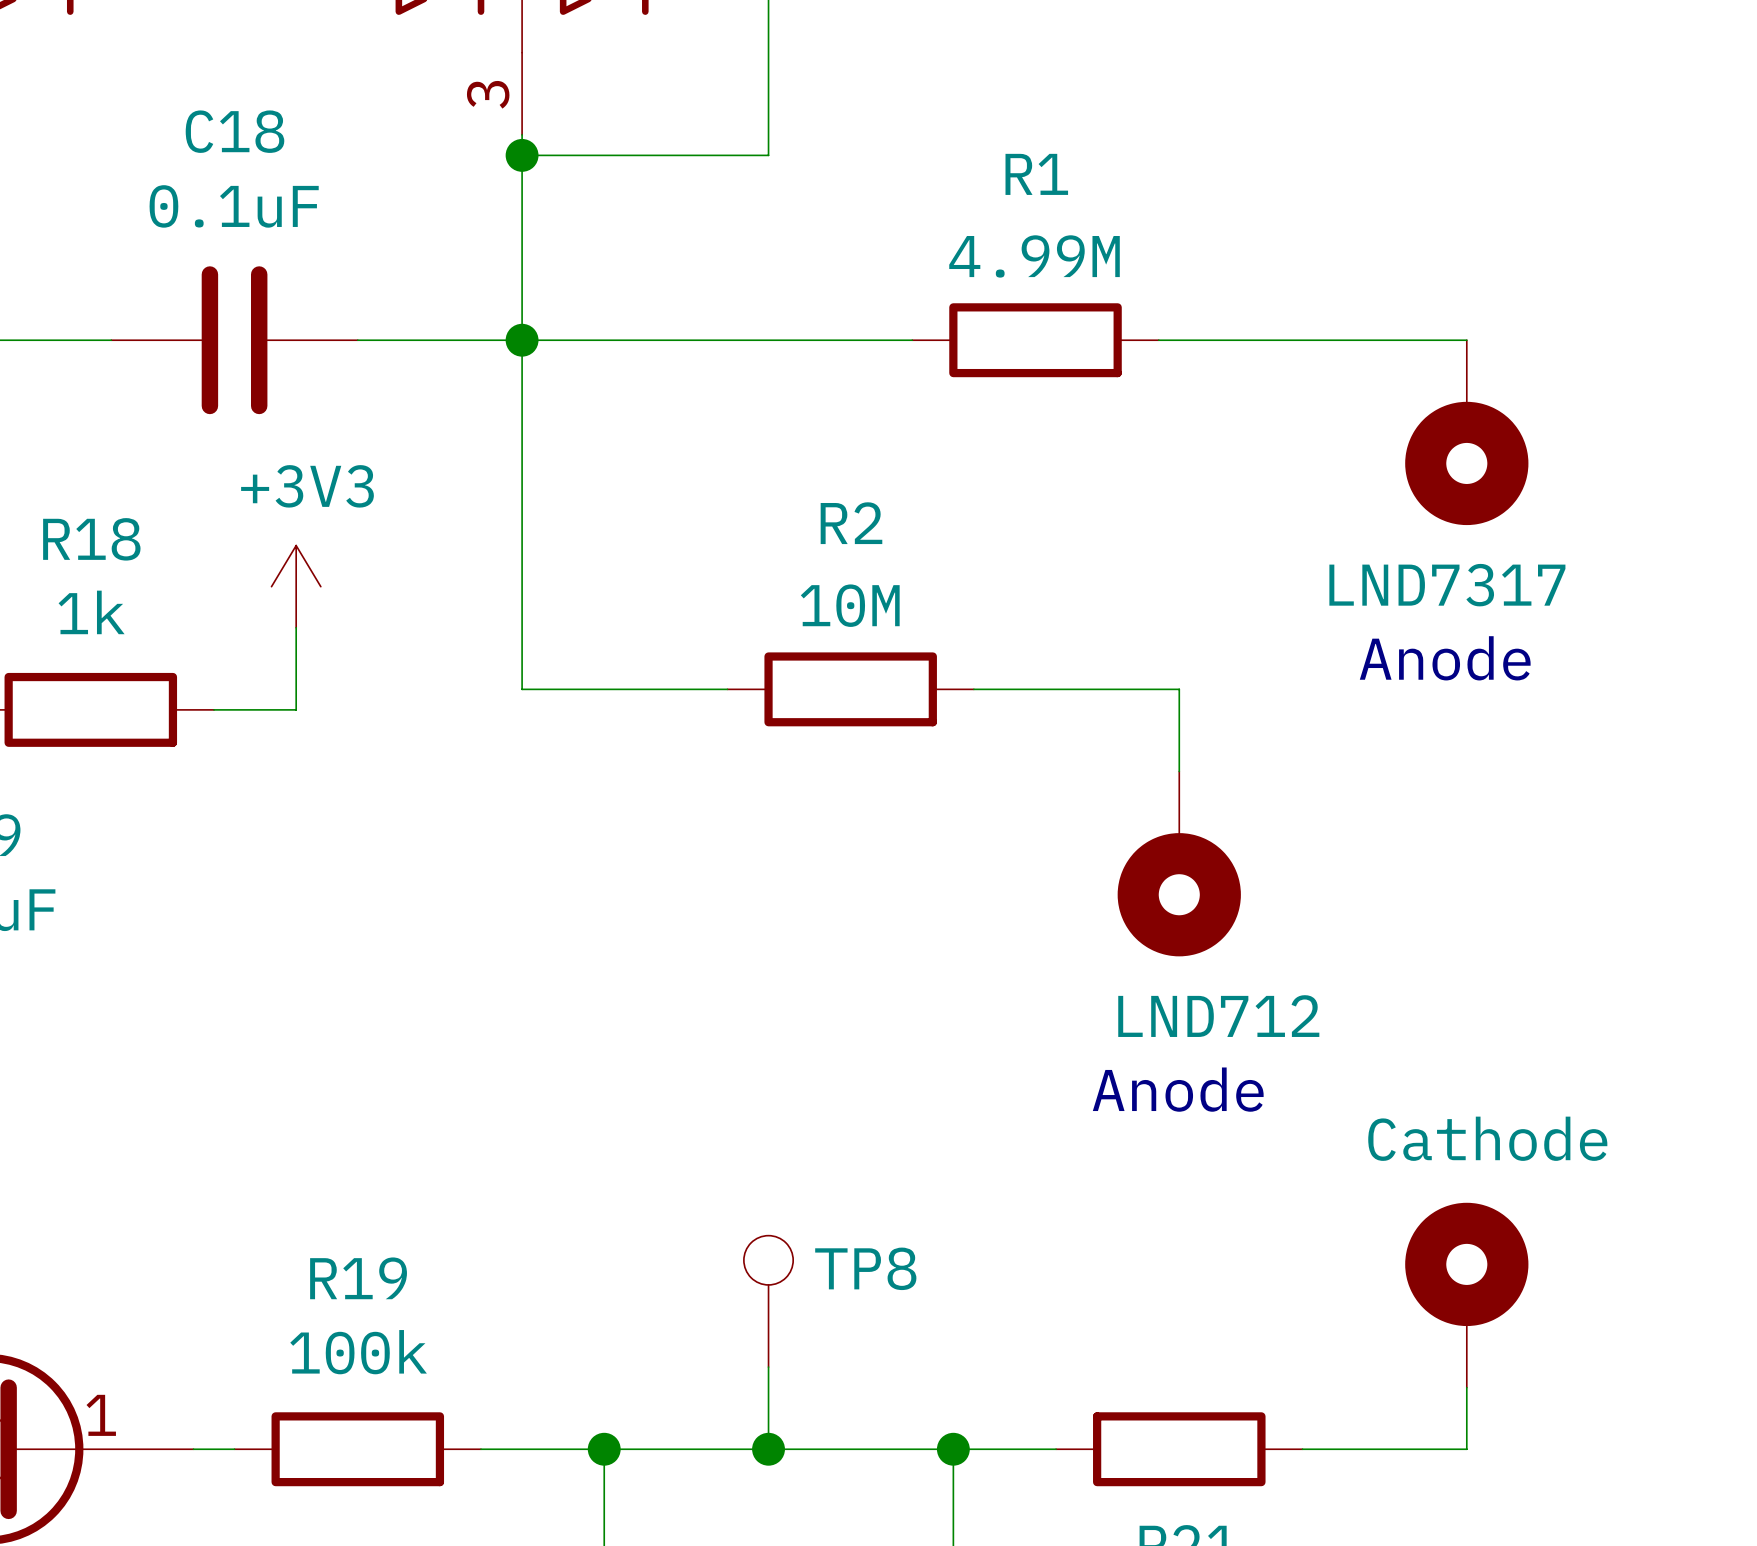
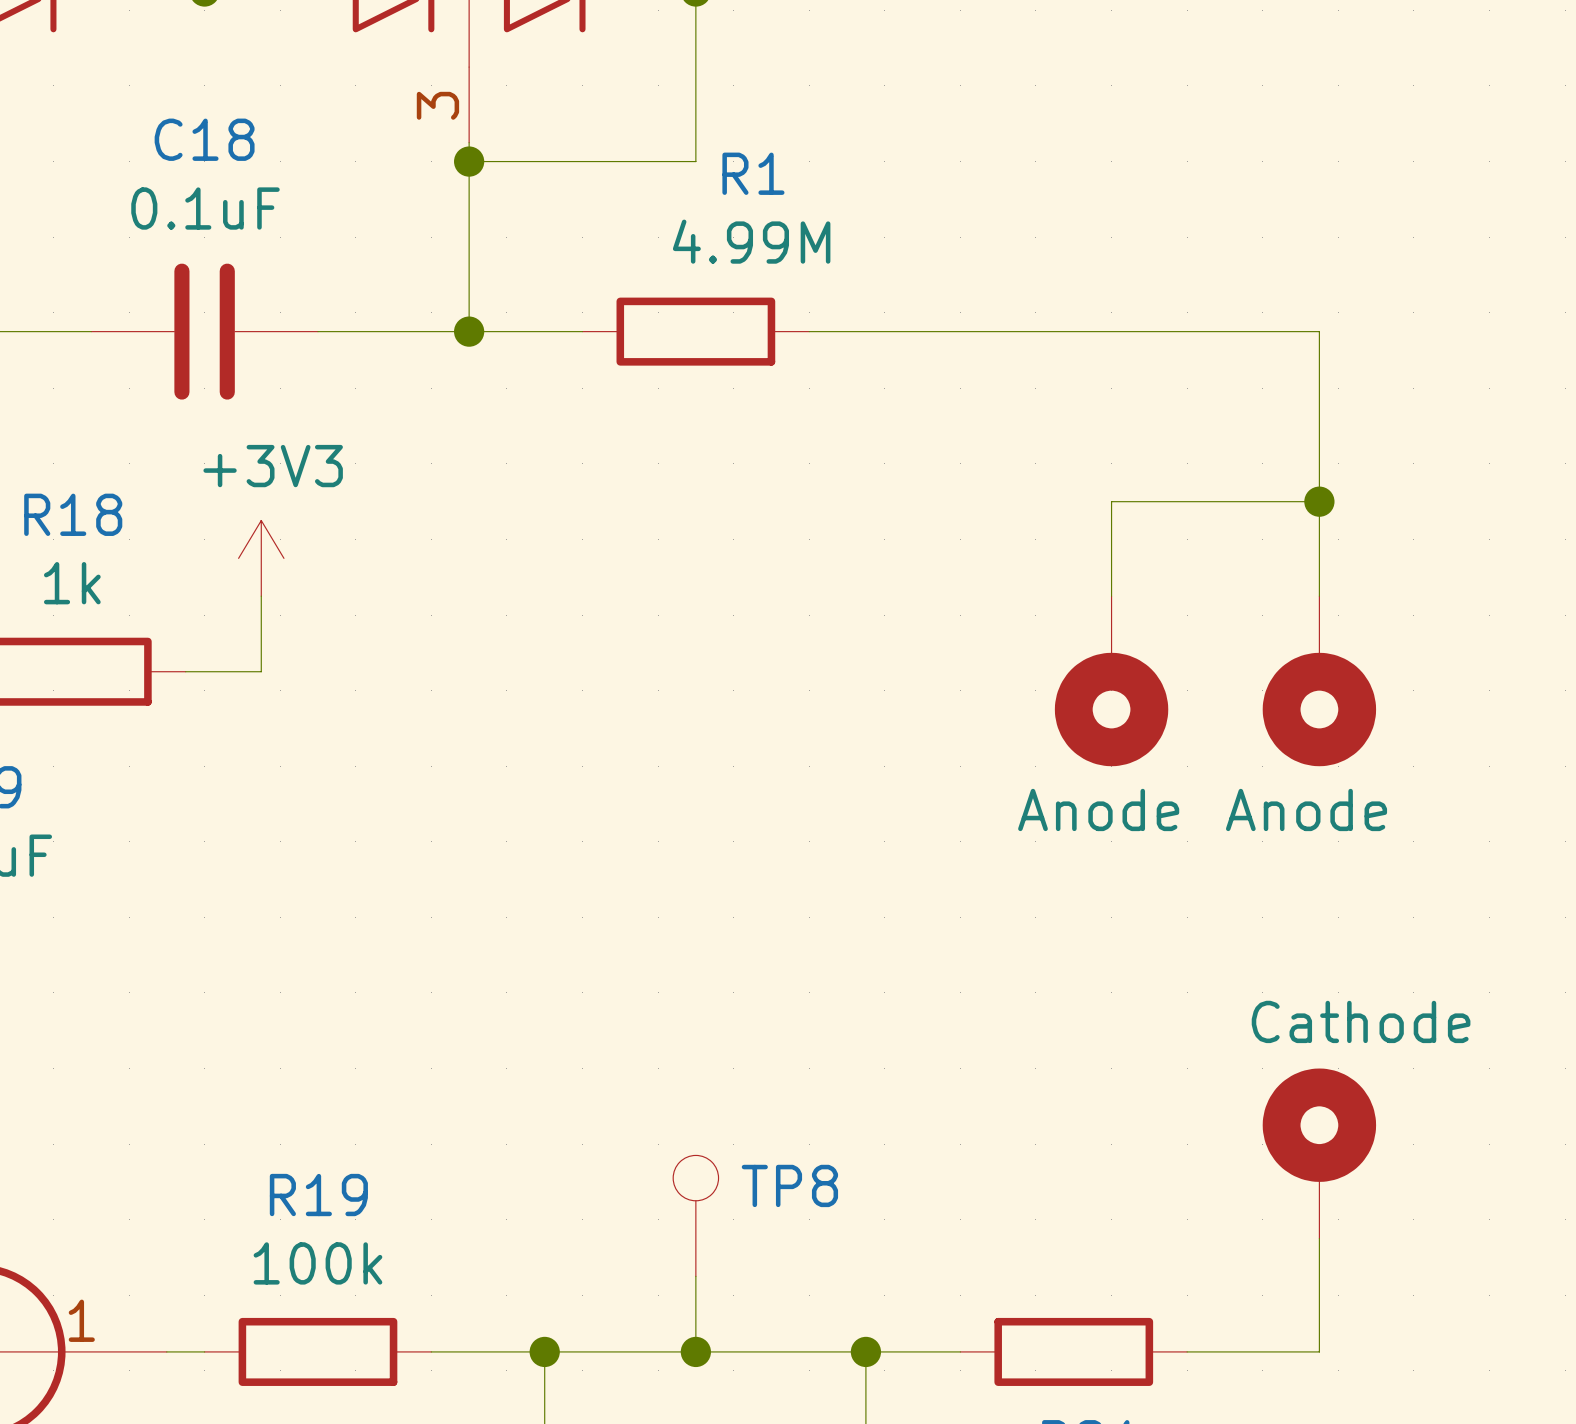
R1 name position: R1 (1036, 174) -> R1 (753, 173)
R1 value position: 4.99M (1034, 256) -> 4.99M (751, 241)
wire: (522, 340) (522, 689) (727, 689) -> none
wire: (645, 340) (891, 340) -> (828, 331) (1054, 331)
R1 position: (1035, 340) -> (695, 331)
wire: (1446, 340) (1466, 340) -> (1319, 331) (1319, 596)
part: LND7317 (1466, 432) -> none
wire: none -> (1319, 501) (1111, 501) (1111, 596)
junction: none -> (1319, 501)
text: Anode (1445, 658) -> none
R2: 10M (850, 689) -> none
wire: (973, 689) (1179, 689) (1179, 771) -> none
part: none -> Anode (1111, 681)
part: none -> Anode (1319, 681)
part: LND712 (1179, 863) -> none
text: Anode (1178, 1089) -> none
part value position: Cathode (1487, 1138) -> Cathode (1361, 1021)
part position: (1466, 1295) -> (1319, 1153)
wire: (1466, 1387) (1466, 1449) (1446, 1449) -> (1319, 1238) (1319, 1351)

